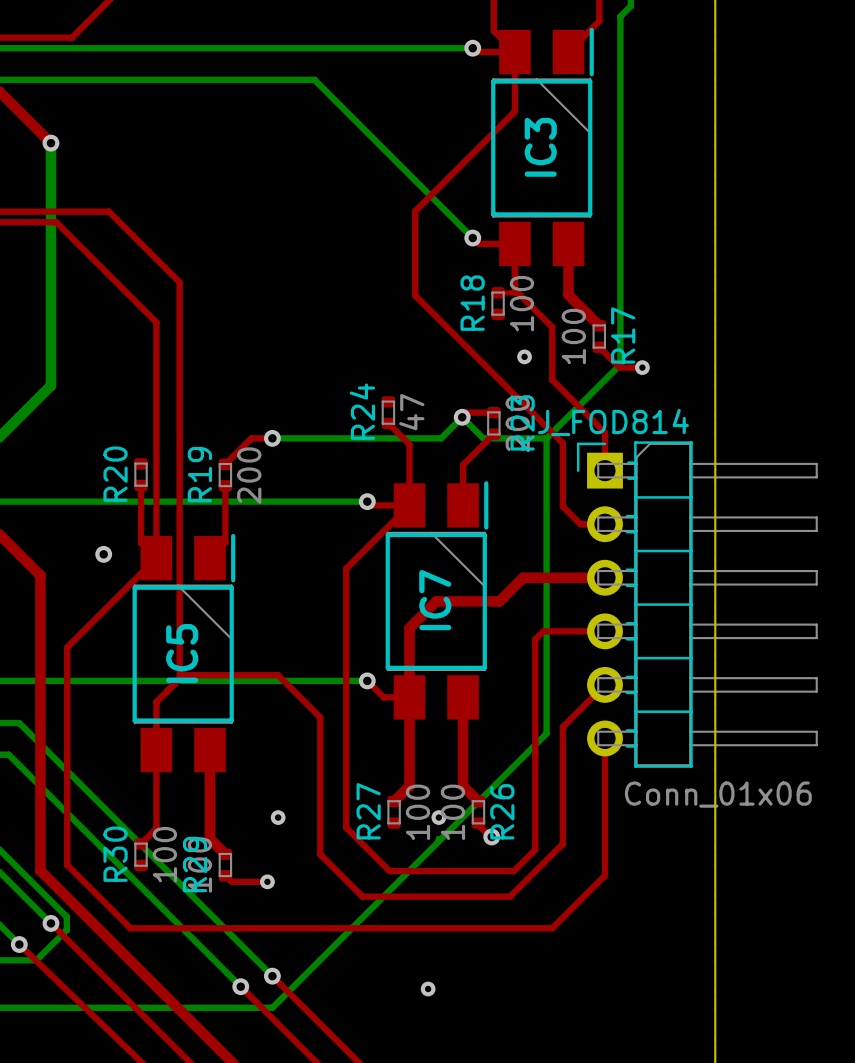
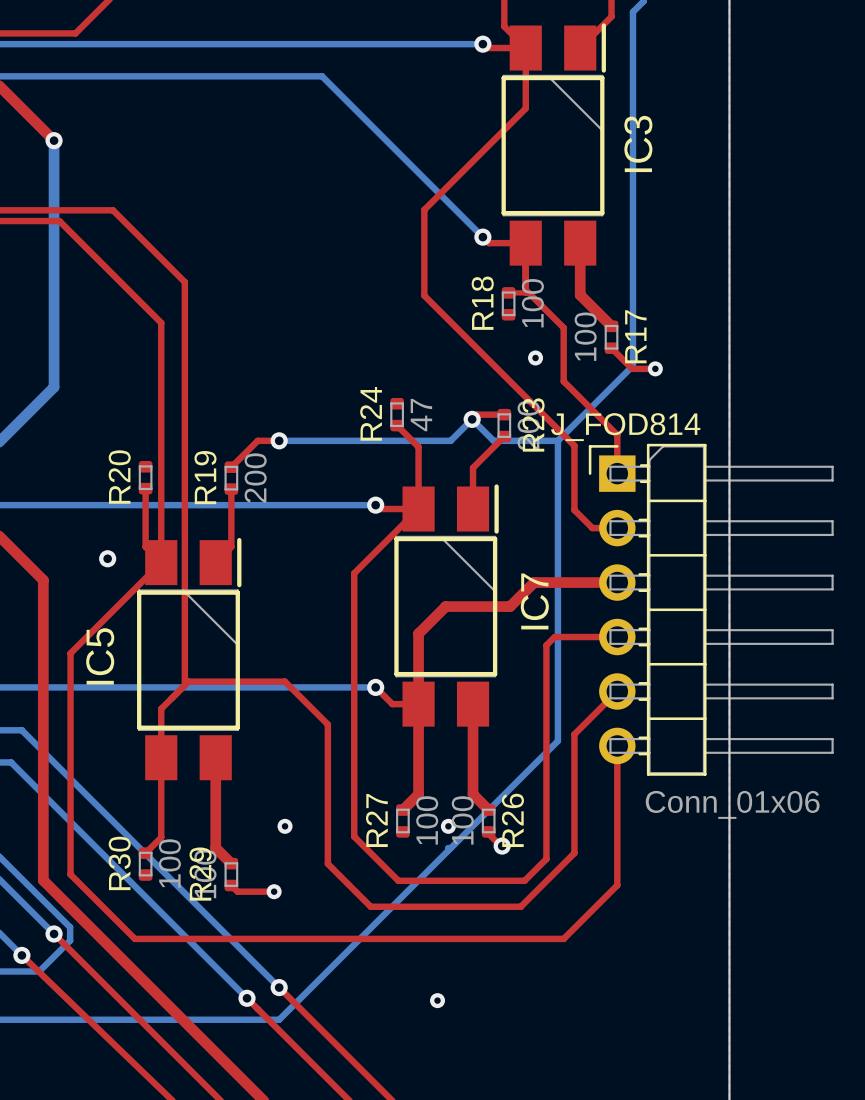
IC3 name position: IC3 (540, 147) -> IC3 (638, 143)
IC7 name position: IC7 (435, 600) -> IC7 (534, 601)
IC5 name position: IC5 (182, 653) -> IC5 (100, 656)

